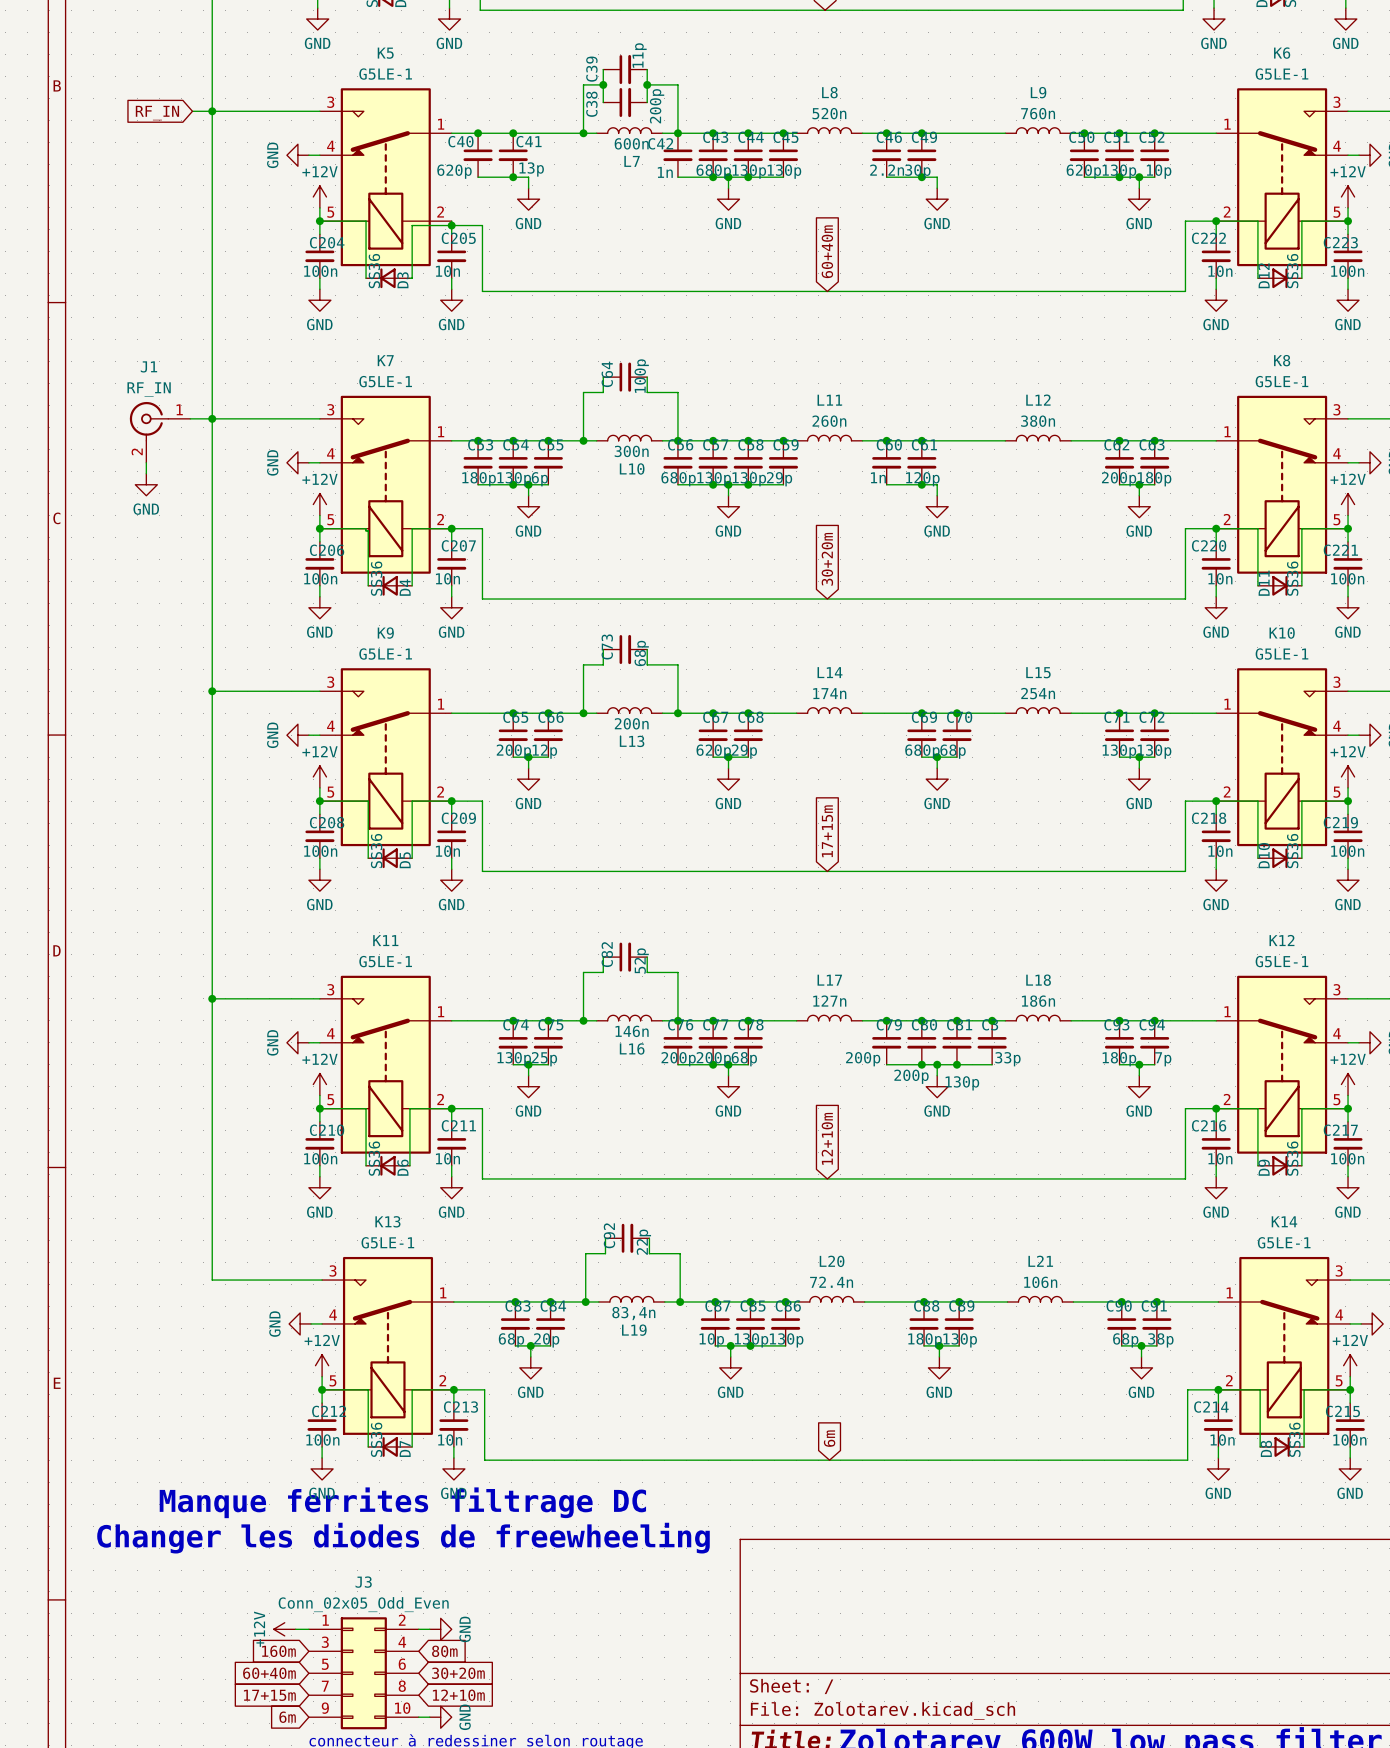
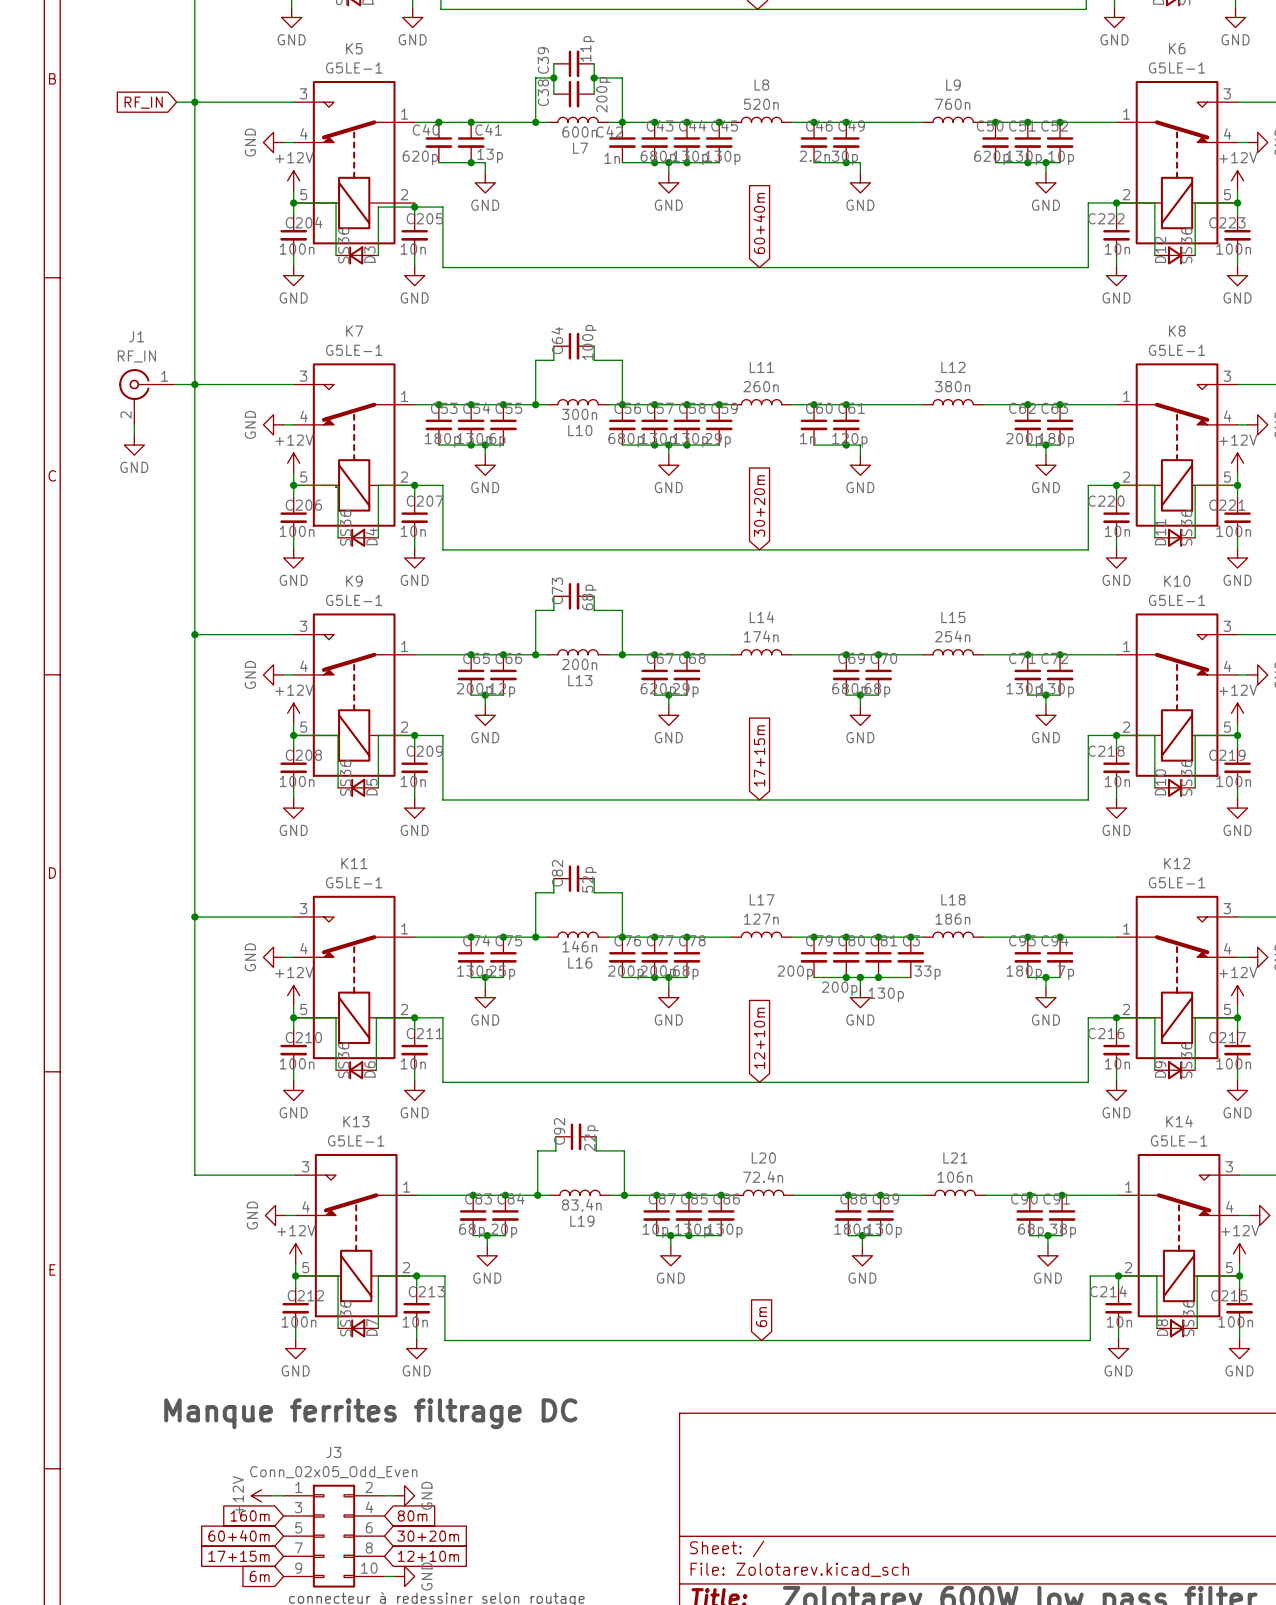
text: Manque ferrites filtrage DC (402, 1502) -> none
text: Changer les diodes de freewheeling (403, 1538) -> Manque ferrites filtrage DC (370, 1413)

